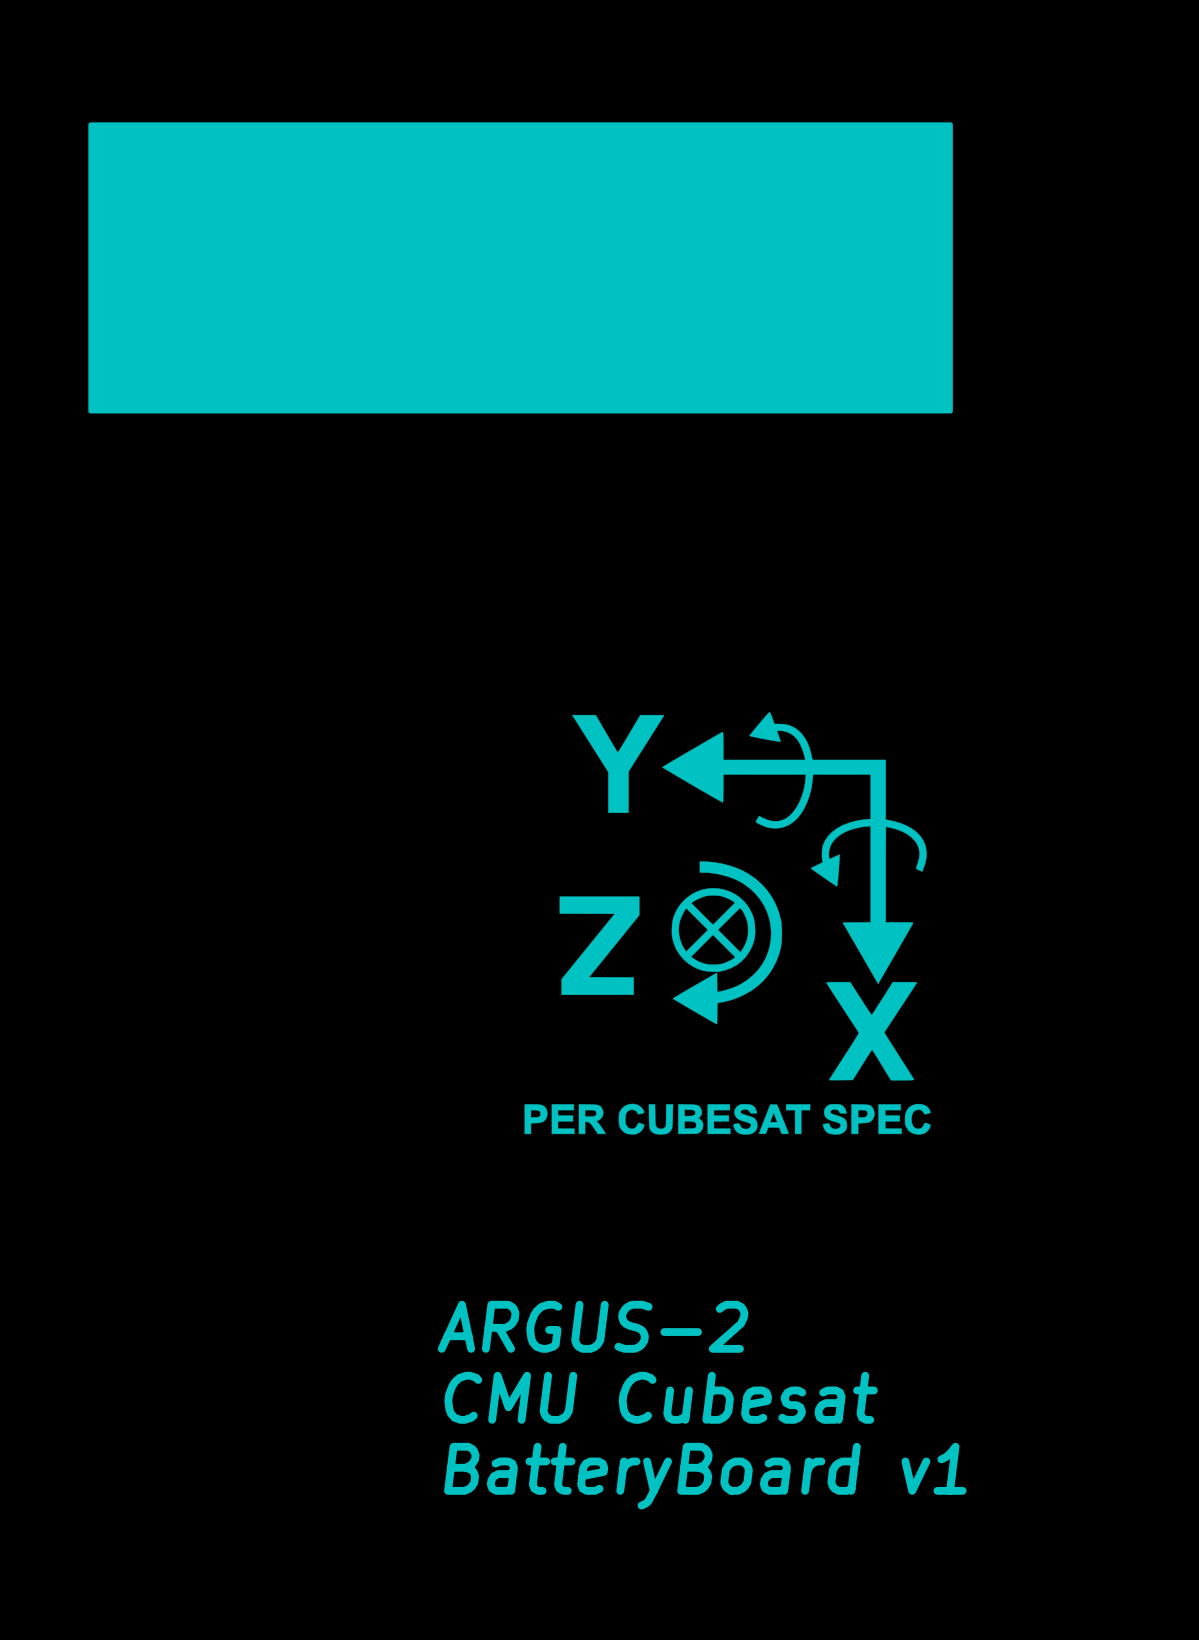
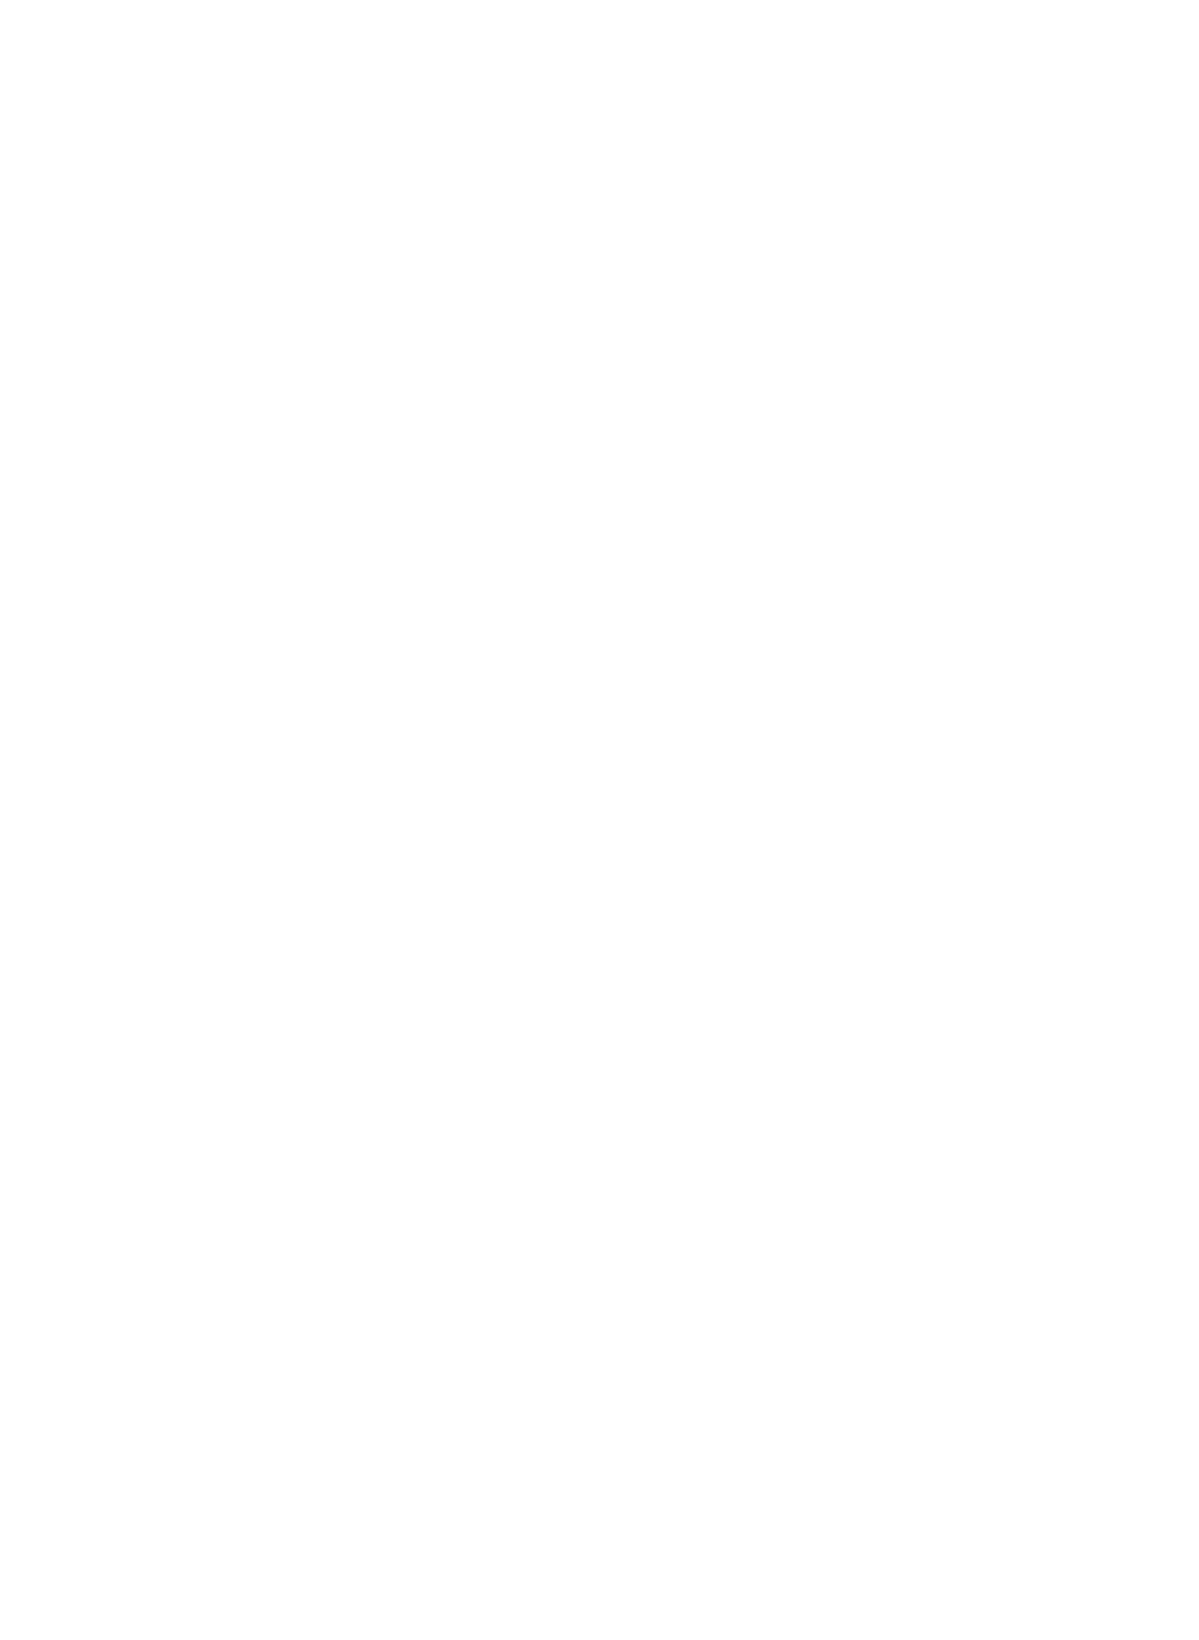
drawing: [88, 122, 953, 414] -> none
drawing: [524, 711, 931, 1135] -> none
text: ARGUS-2 (593, 1326) -> none
text: CMU Cubesat (661, 1397) -> none
text: BatteryBoard v1 (705, 1476) -> none

